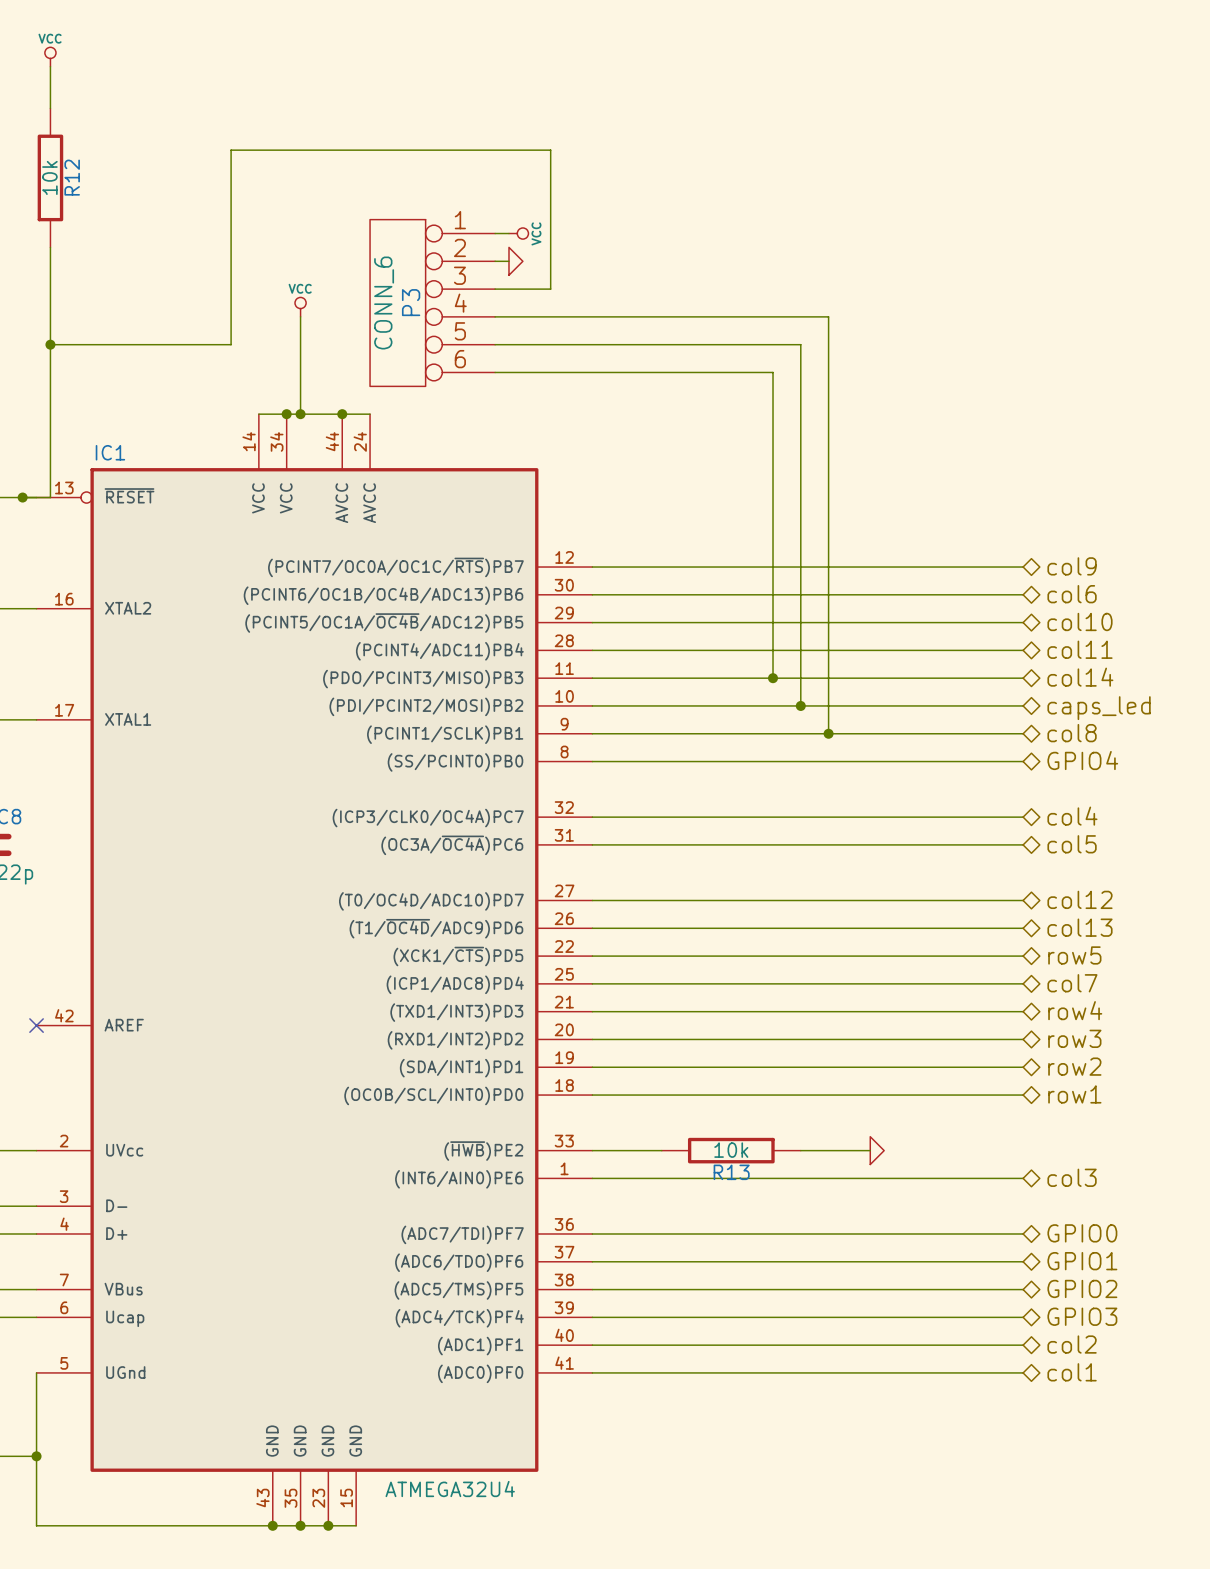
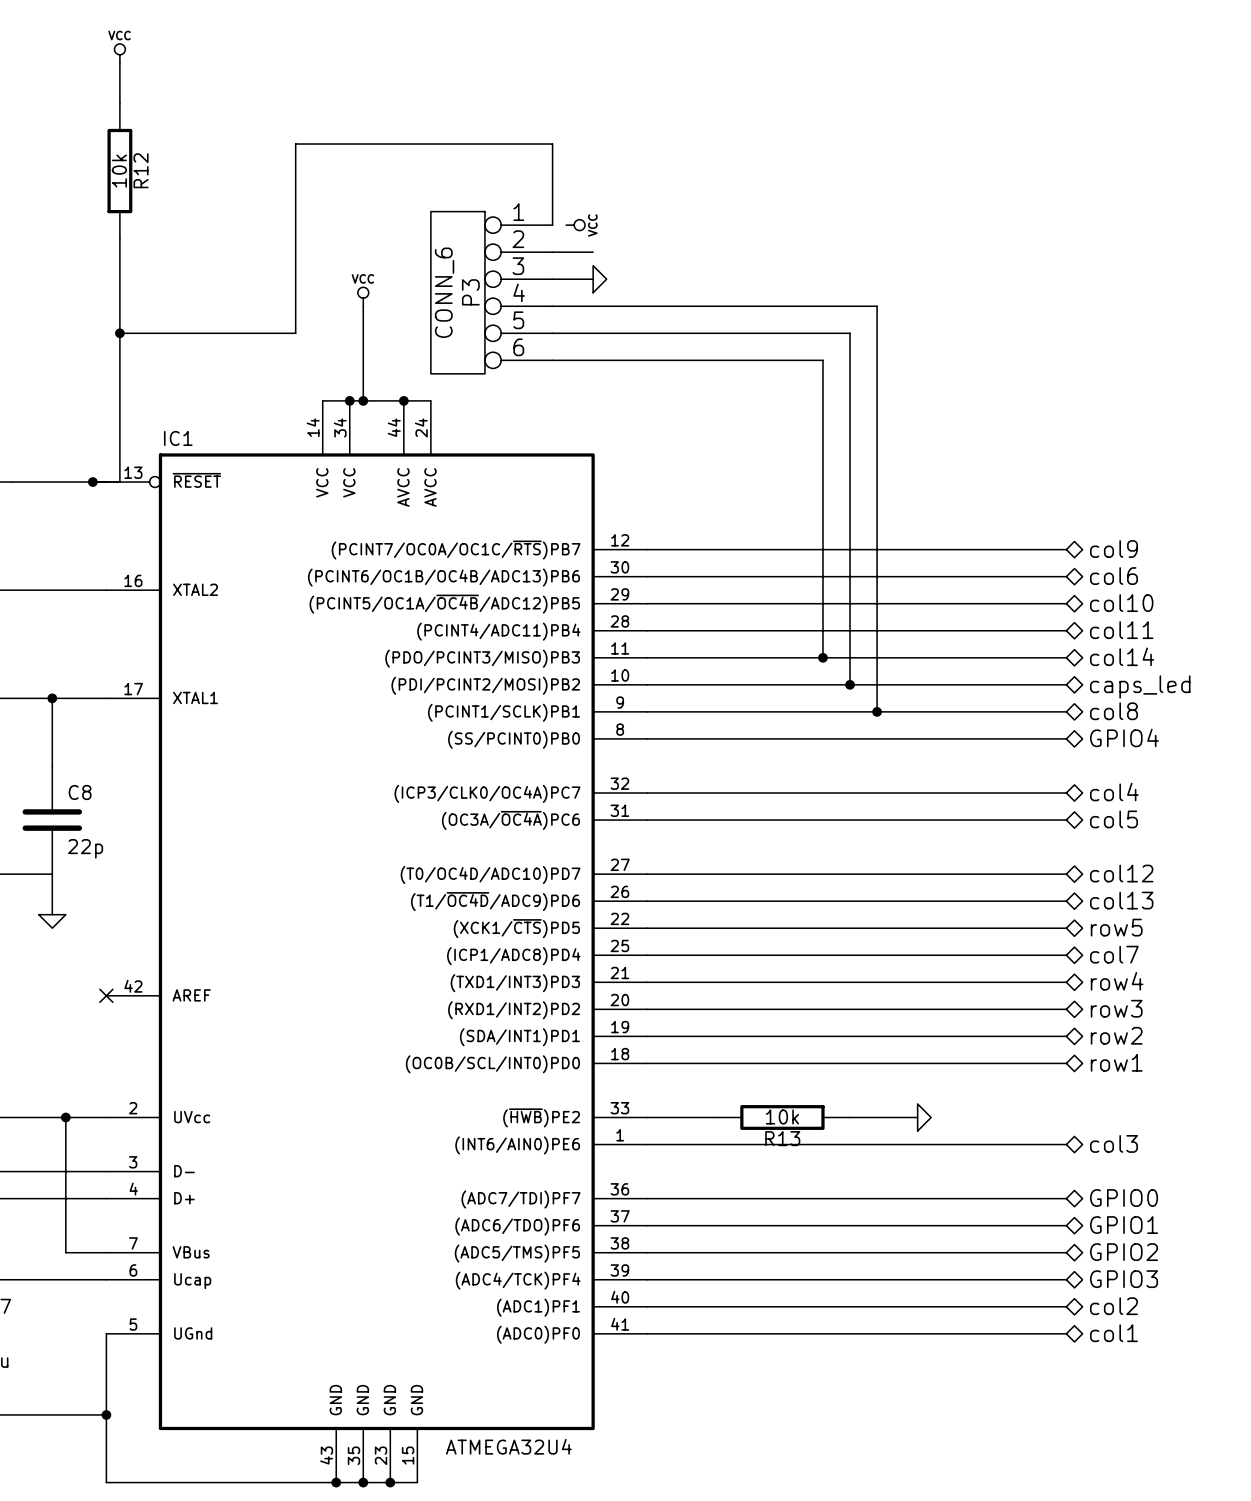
wire: (495, 150) (550, 150) (550, 289) (536, 289) -> (552, 144) (552, 225)
wire: (495, 233) (508, 233) -> none
wire: none -> (566, 252) (593, 252)
power symbol position: (515, 261) -> (599, 279)

